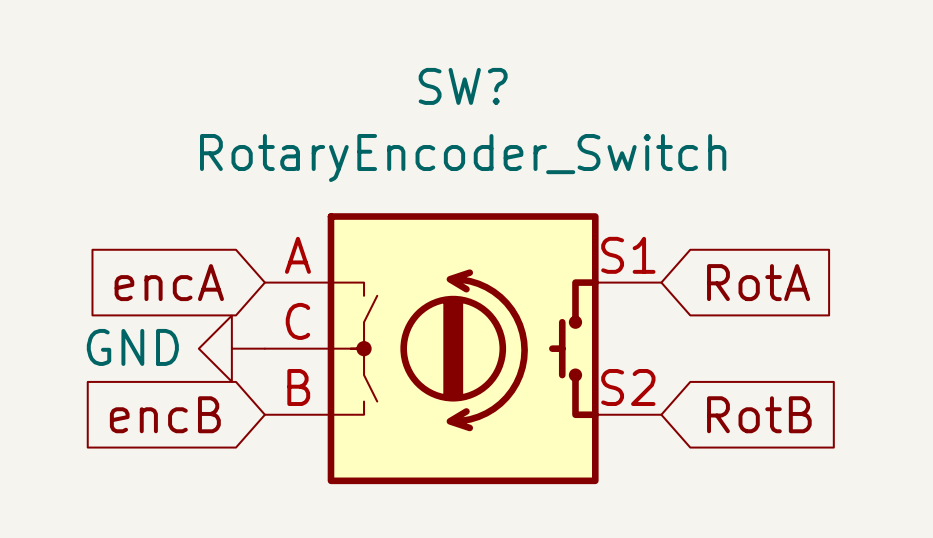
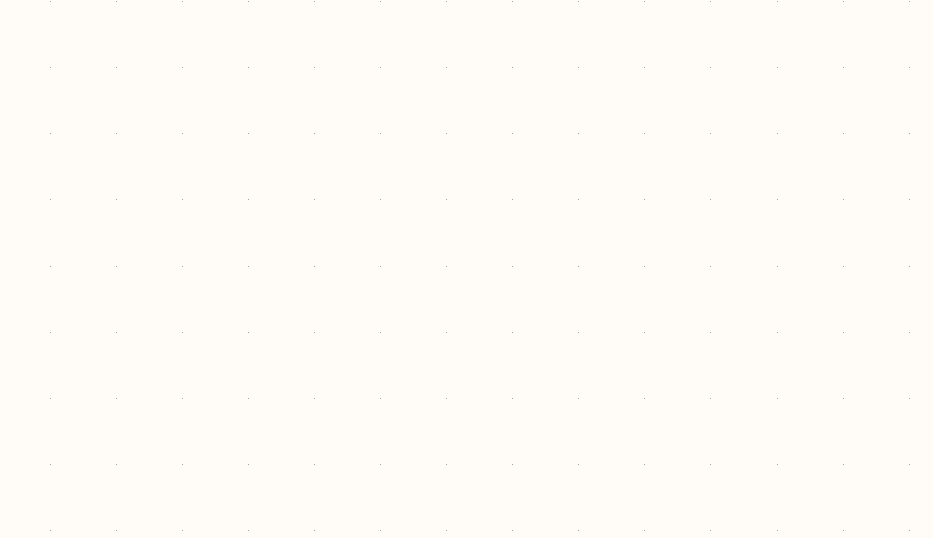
global label: encA (169, 282) -> none
global label: RotA (758, 282) -> none
power symbol: GND (231, 348) -> none
SW?: RotaryEncoder_Switch (463, 348) -> none
global label: encB (165, 414) -> none
global label: RotB (759, 414) -> none

